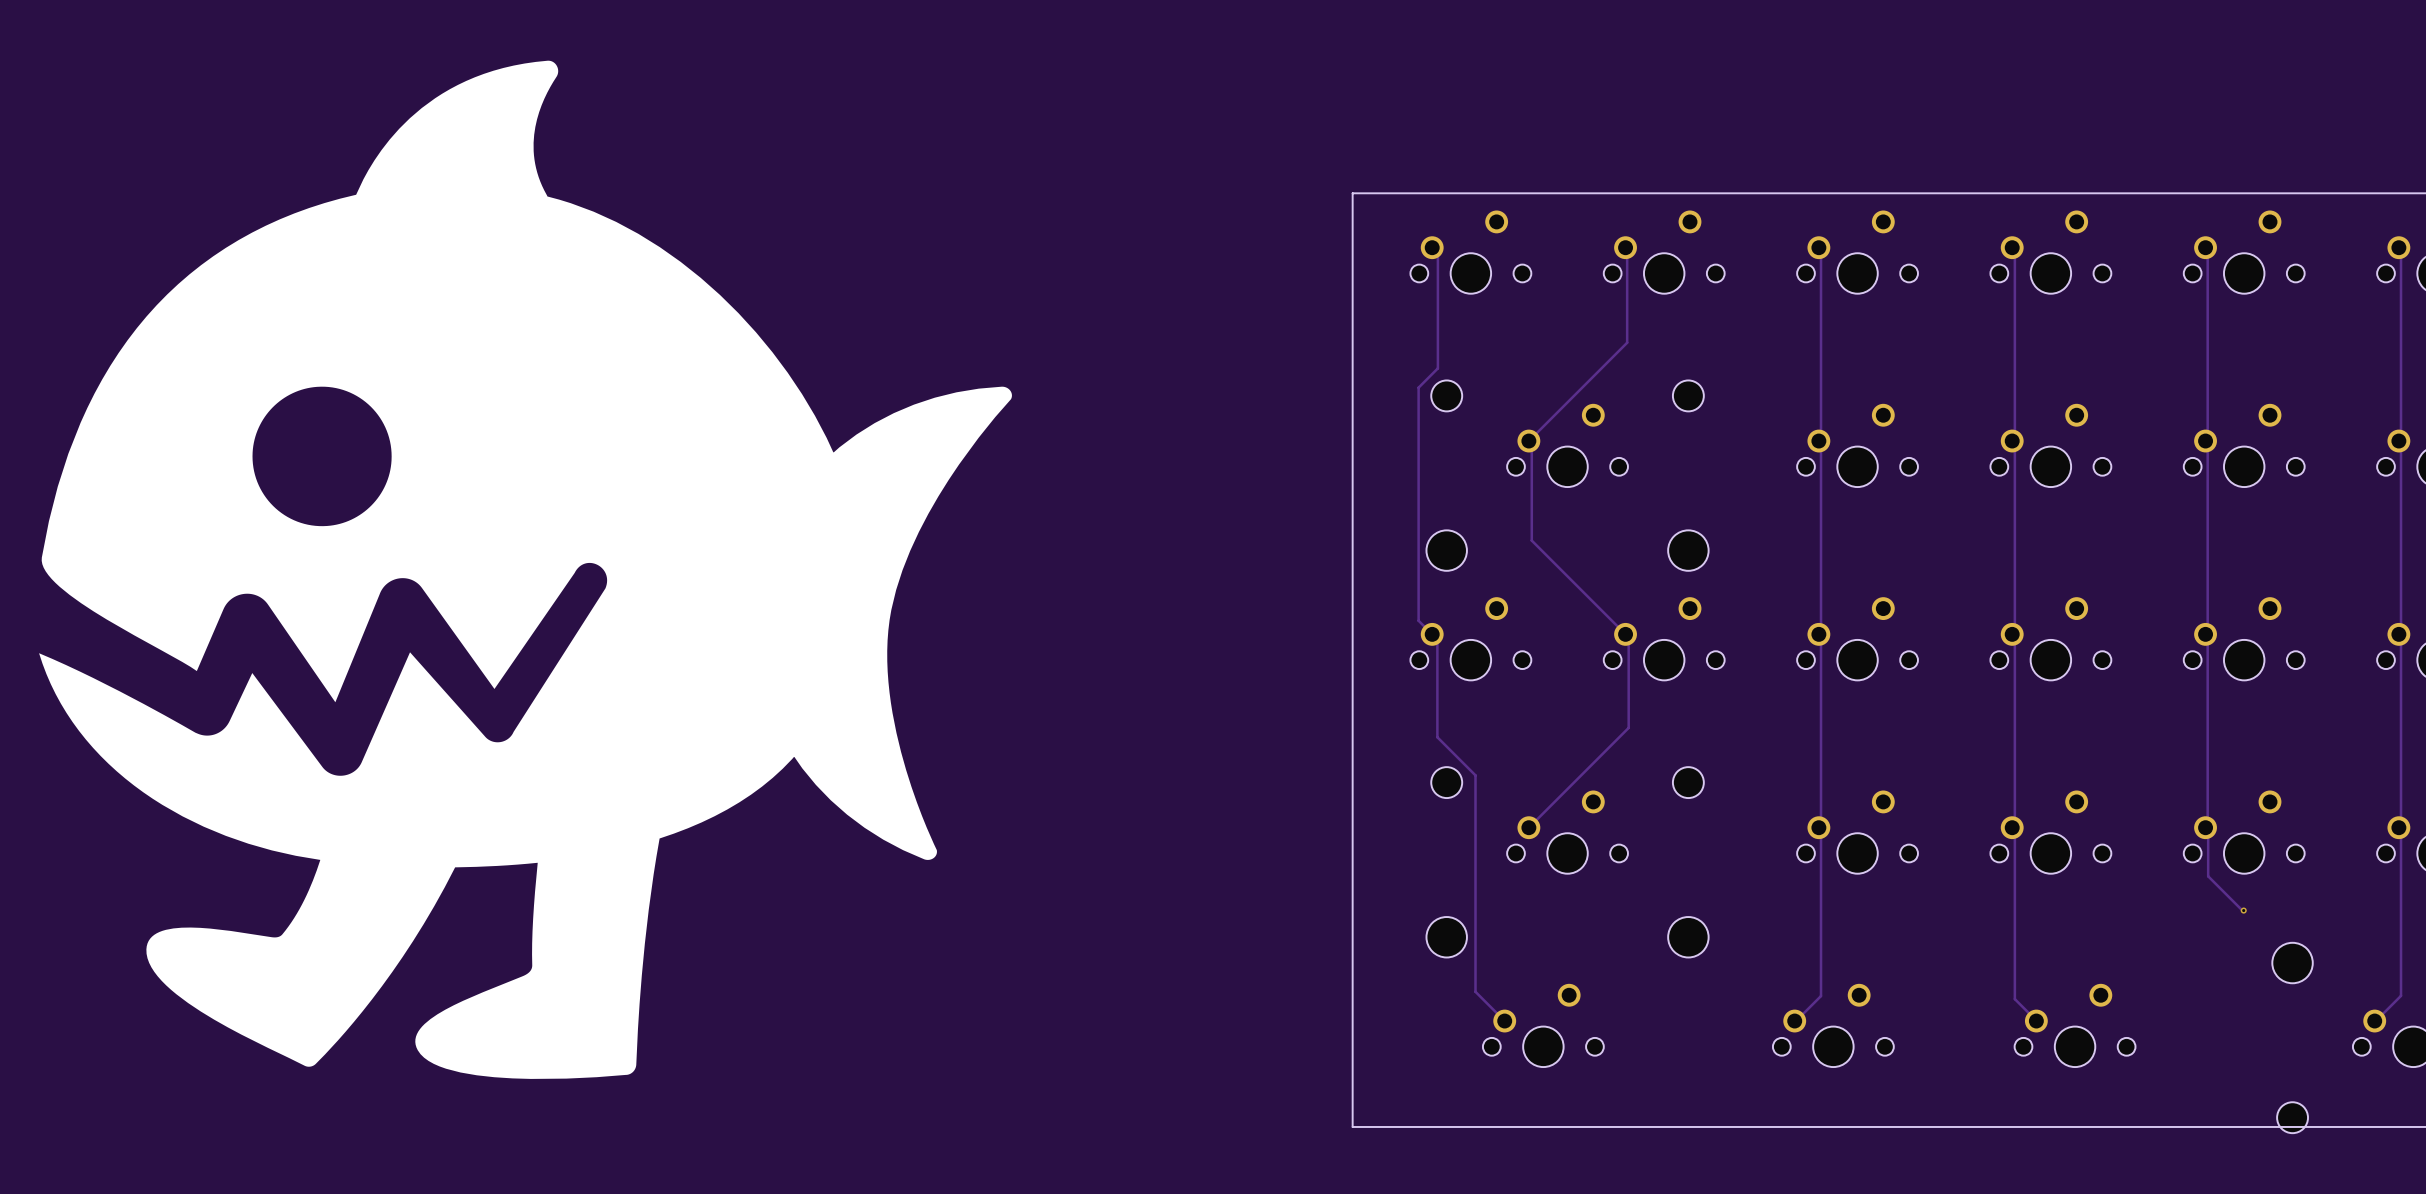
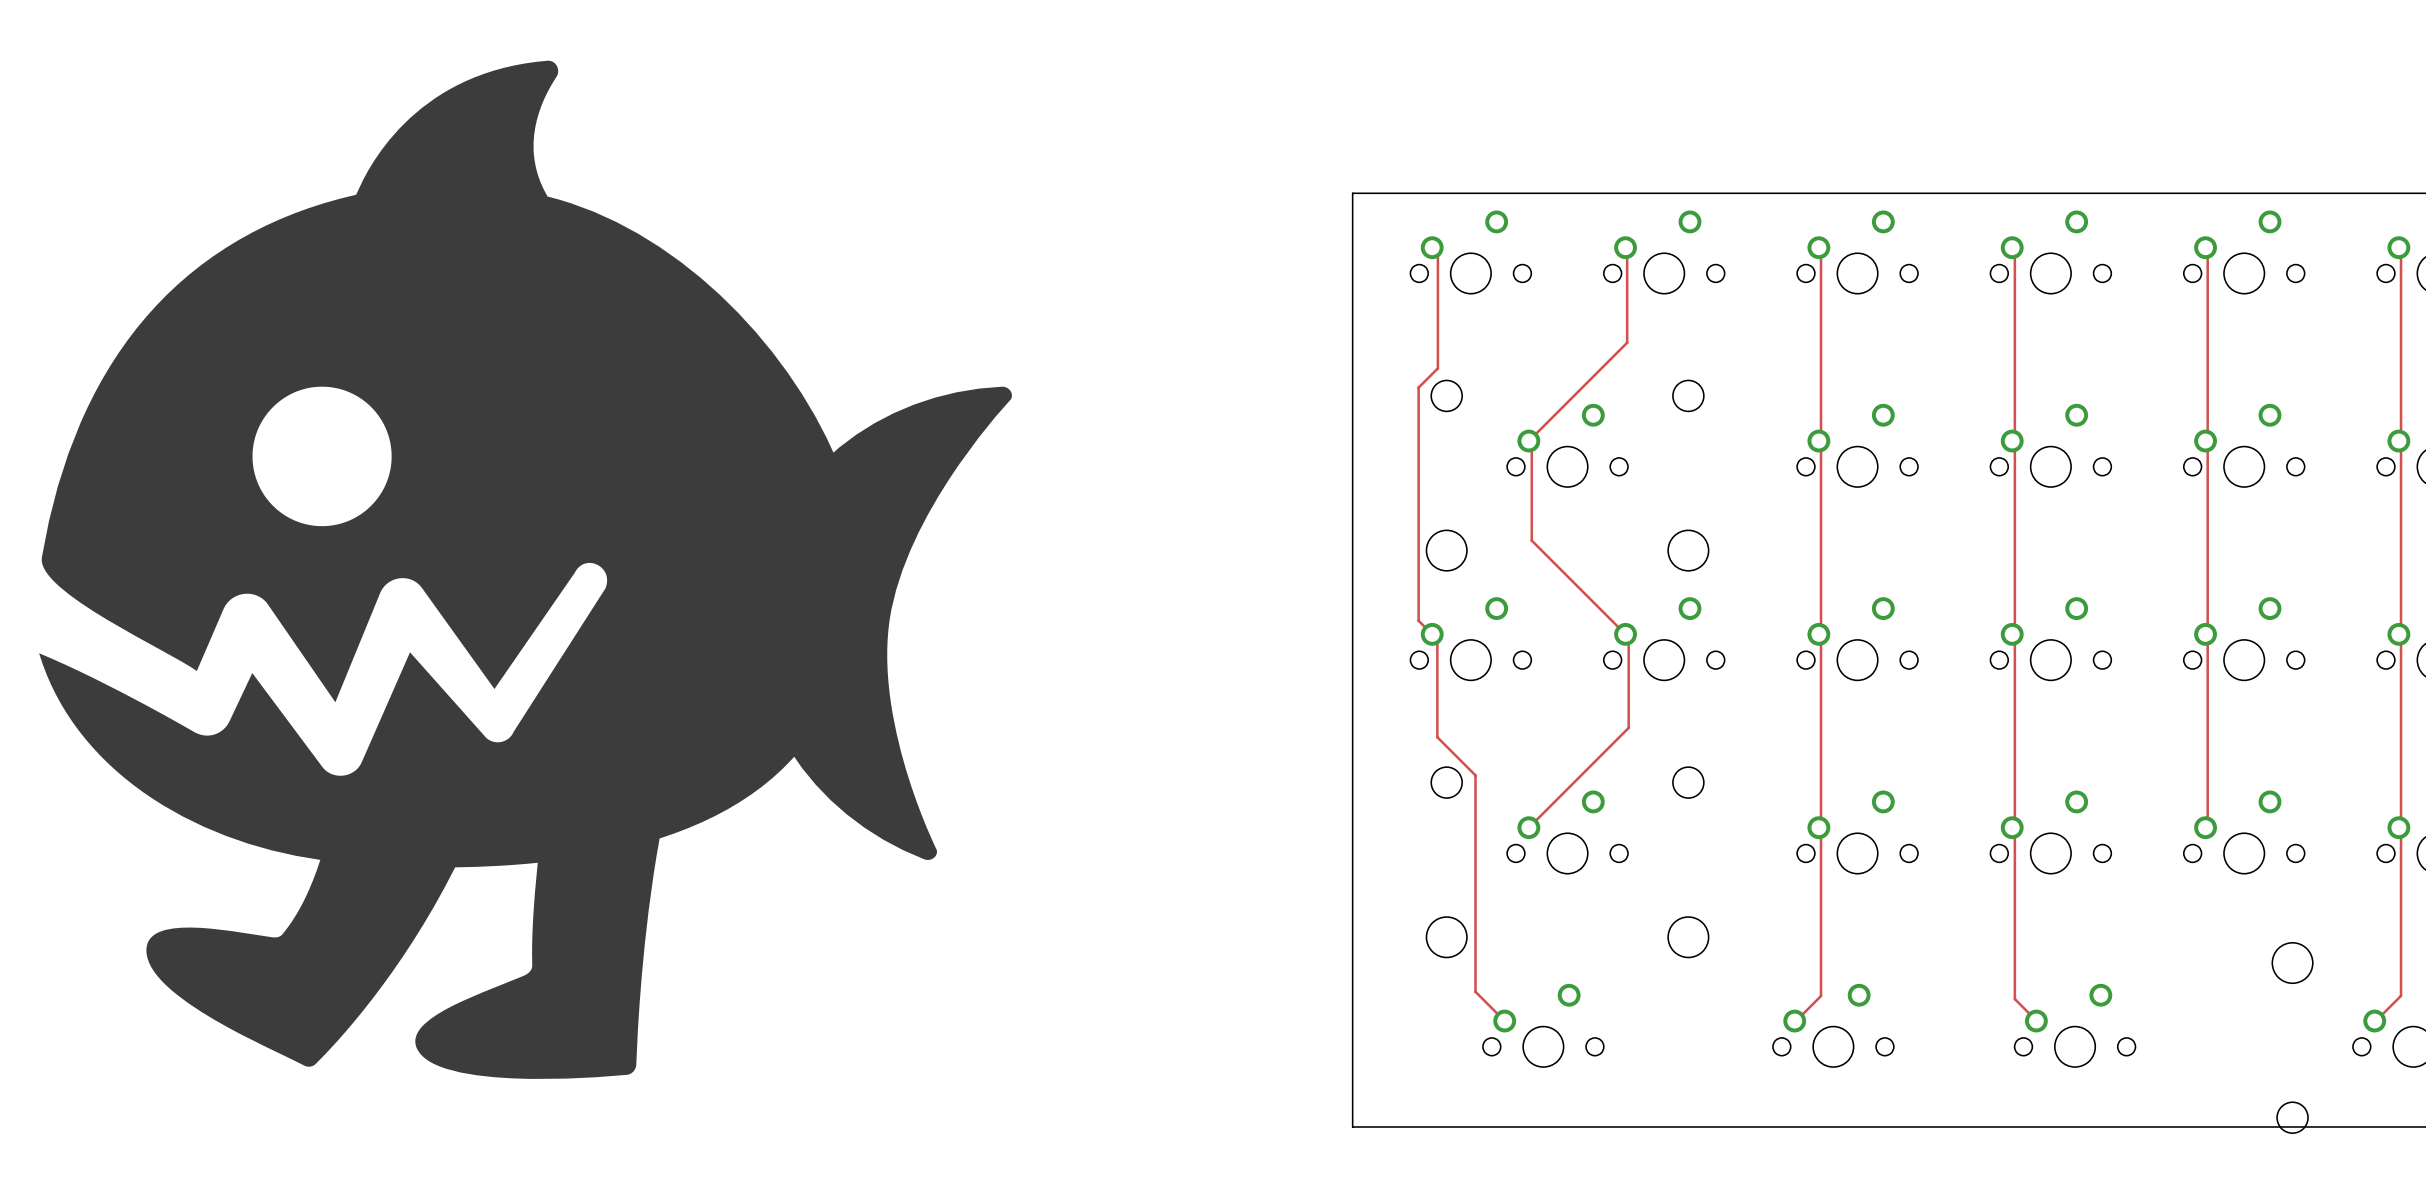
track: (2205, 827) (2208, 830) (2208, 876) (2243, 910) -> none
via: (2243, 910) -> none

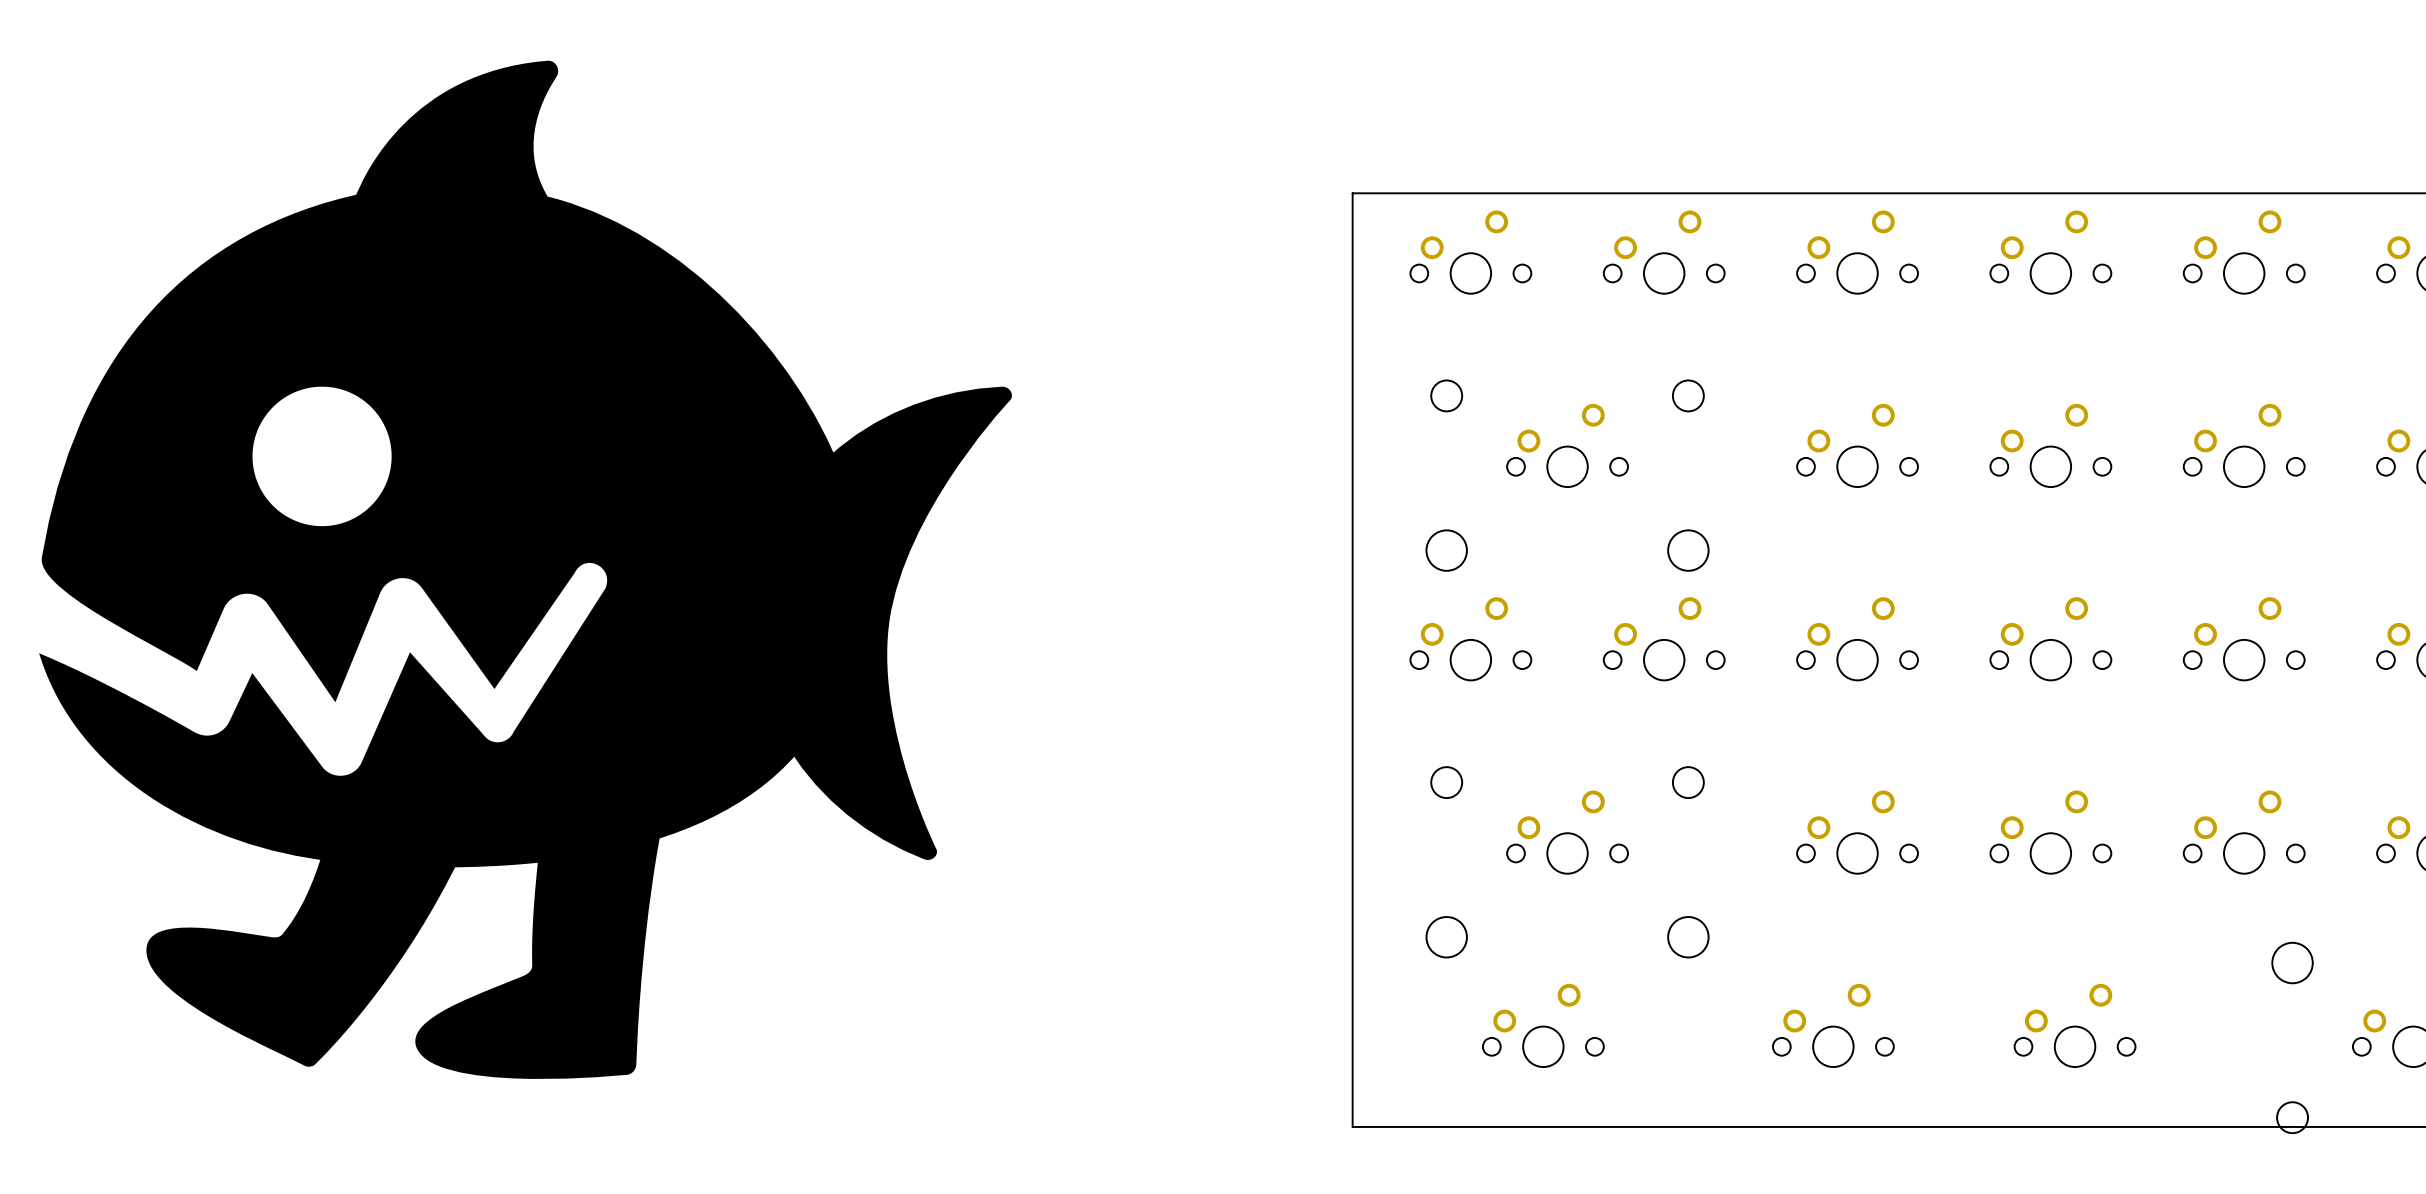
track: (1432, 247) (1437, 253) (1437, 368) (1418, 387) (1418, 620) (1437, 639) (1437, 737) (1475, 775) (1475, 991) (1504, 1021) -> none
track: (1625, 247) (1627, 249) (1627, 342) (1528, 441) (1531, 443) (1531, 540) (1628, 637) (1628, 727) (1528, 827) -> none
track: (1820, 247) (1821, 996) (1796, 1021) -> none
track: (2014, 247) (2014, 999) (2038, 1021) -> none
track: (2206, 247) (2206, 827) -> none
track: (2400, 247) (2401, 995) (2376, 1020) -> none

